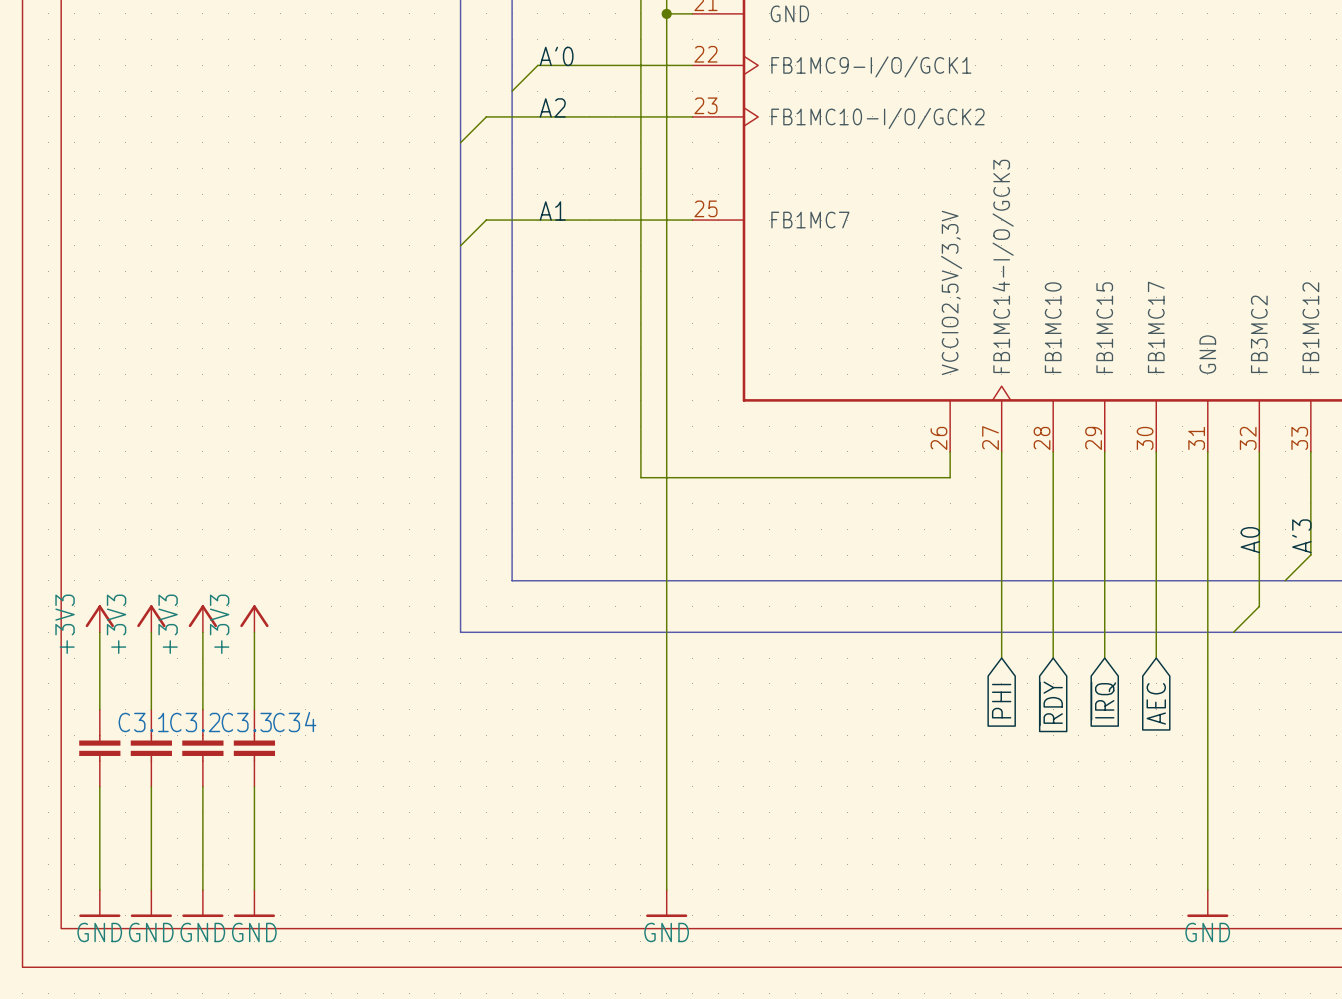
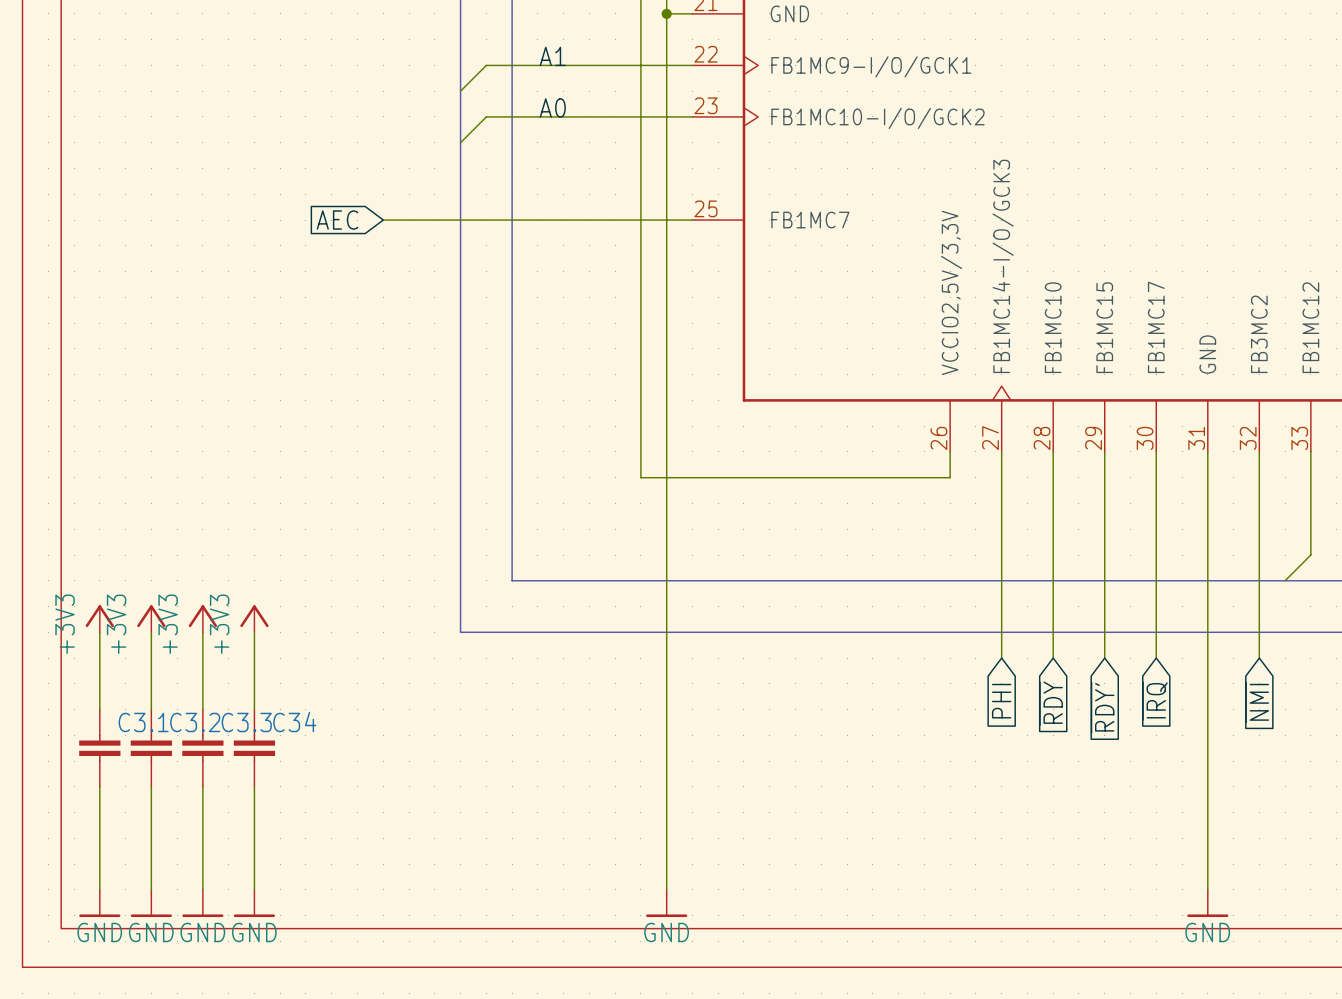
label: A'0 (556, 56) -> A1 (552, 56)
wire: (537, 65) (512, 91) -> (537, 65) (486, 65) (460, 91)
label: A2 (552, 107) -> A0 (552, 107)
label: A1 (552, 211) -> none
global label: none -> AEC (337, 220)
wire: (486, 220) (460, 245) -> (486, 220) (383, 220)
label: A'3 (1301, 536) -> none
label: A0 (1250, 540) -> none
wire: (1259, 606) (1233, 632) -> (1259, 606) (1259, 658)
global label: ~{IRQ} (1103, 701) -> ~{RDY'} (1102, 707)
global label: none -> ~{NMI} (1257, 702)
global label: AEC (1156, 703) -> ~{IRQ} (1155, 701)

